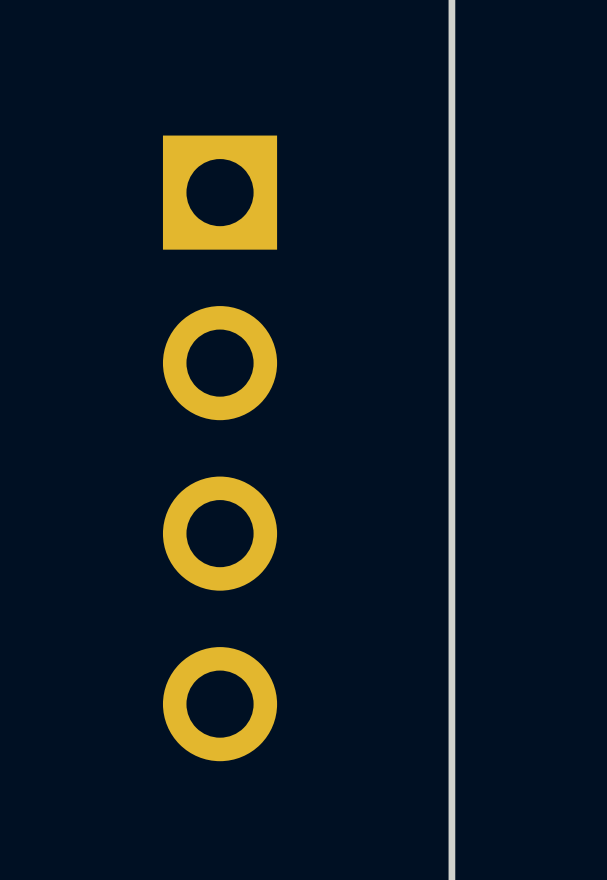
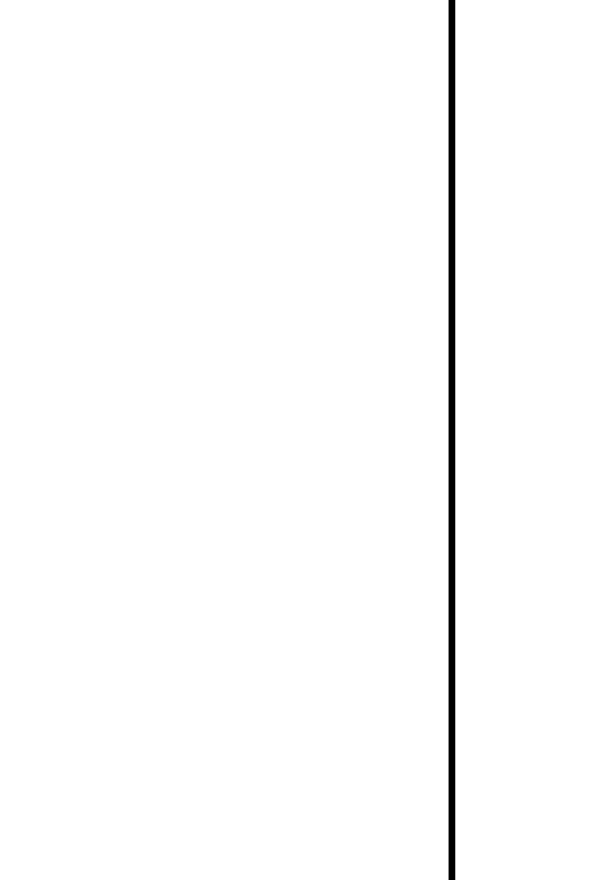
part: (220, 448) -> none

